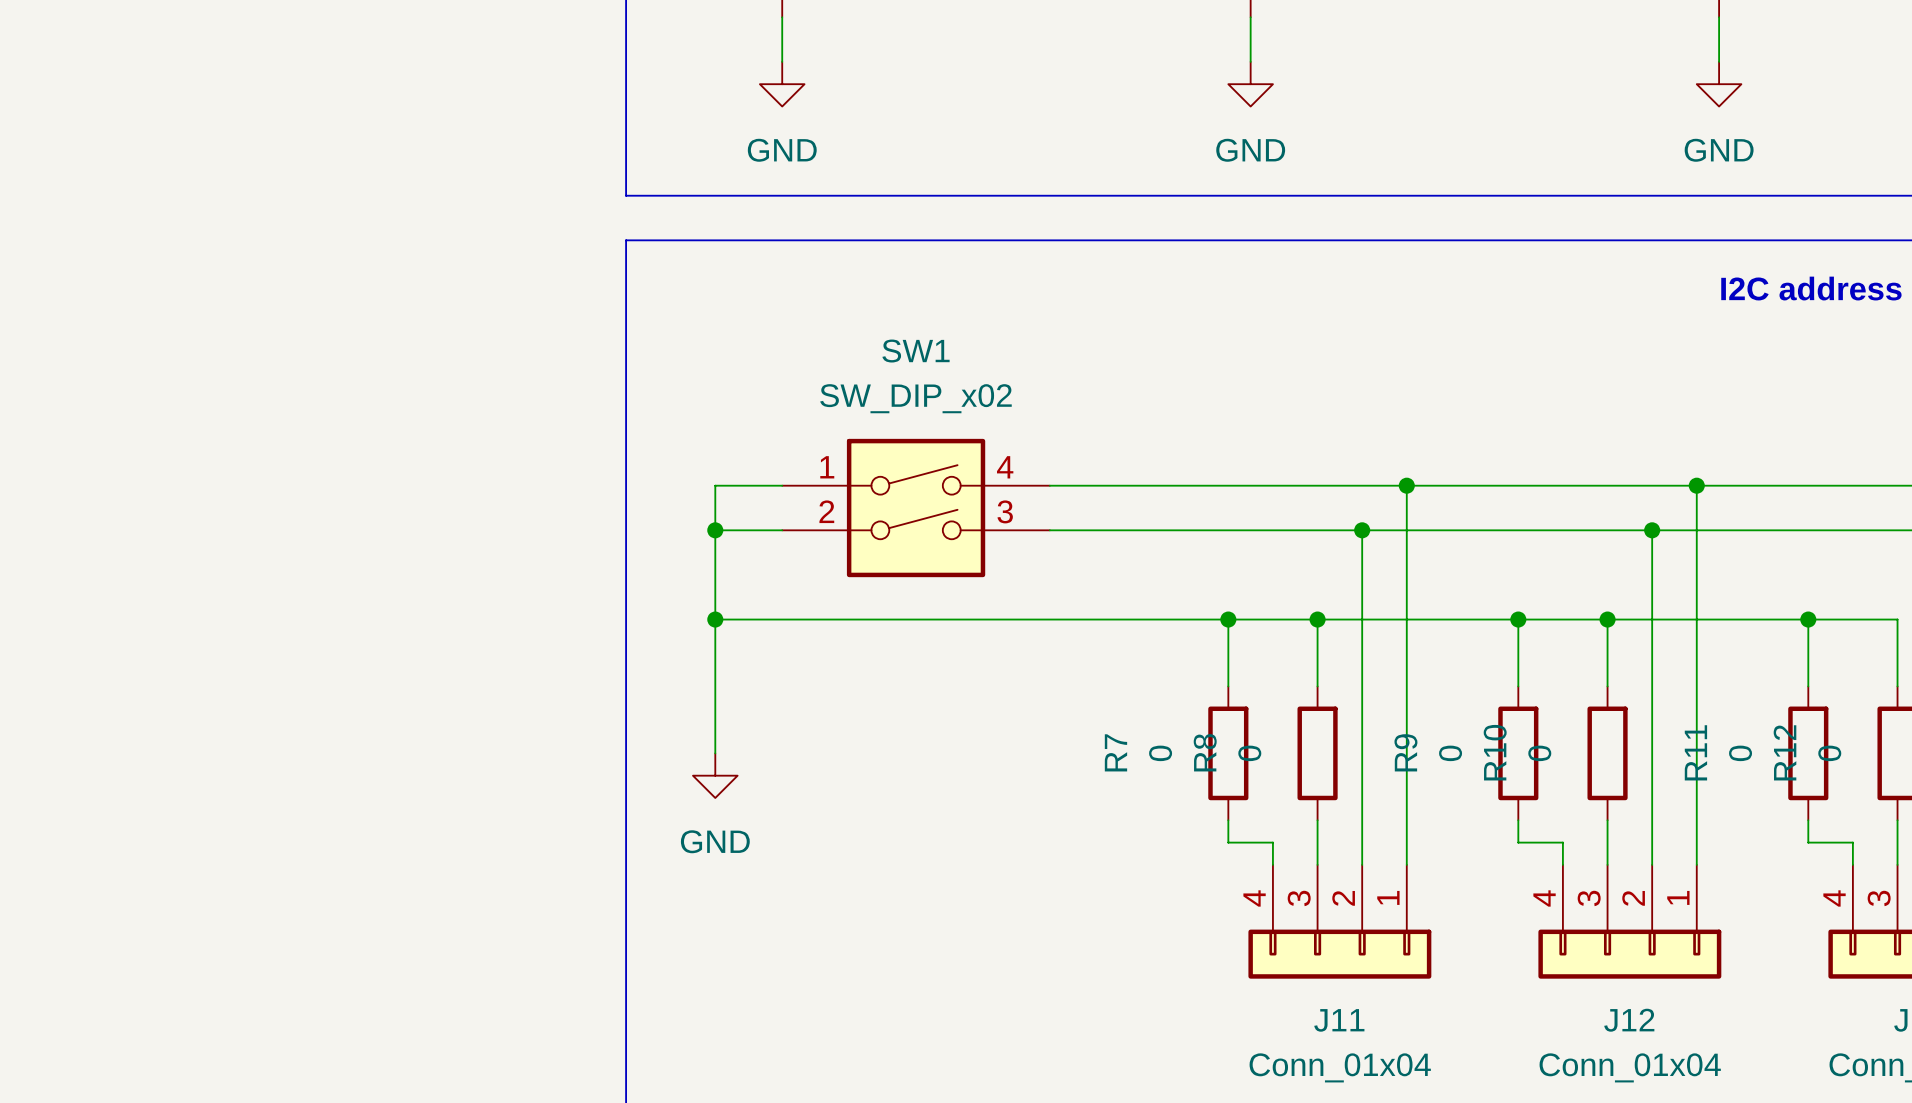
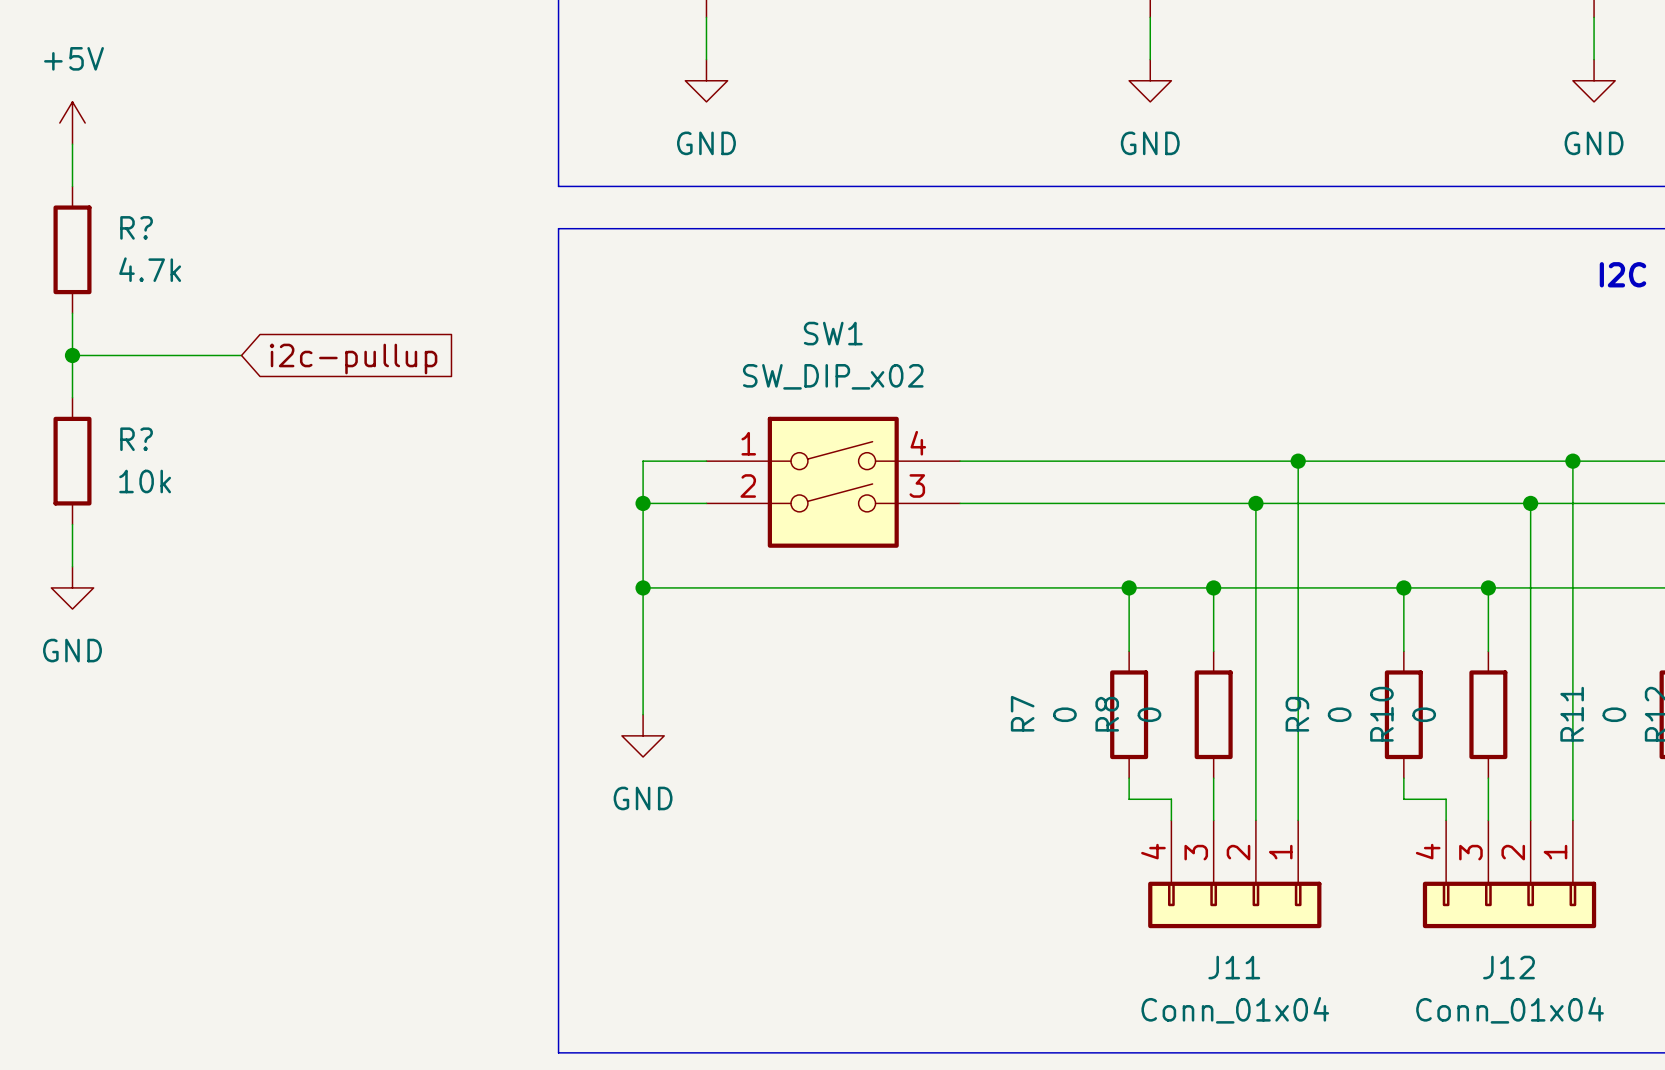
power symbol: none -> +5V (72, 123)
wire: none -> (72, 144) (72, 186)
R?: none -> 4.7k (72, 249)
wire: none -> (72, 313) (72, 397)
wire: none -> (72, 355) (241, 355)
junction: none -> (72, 355)
global label: none -> i2c-pullup (353, 359)
R?: none -> 10k (72, 461)
wire: none -> (72, 524) (72, 566)
power symbol: none -> GND (72, 587)

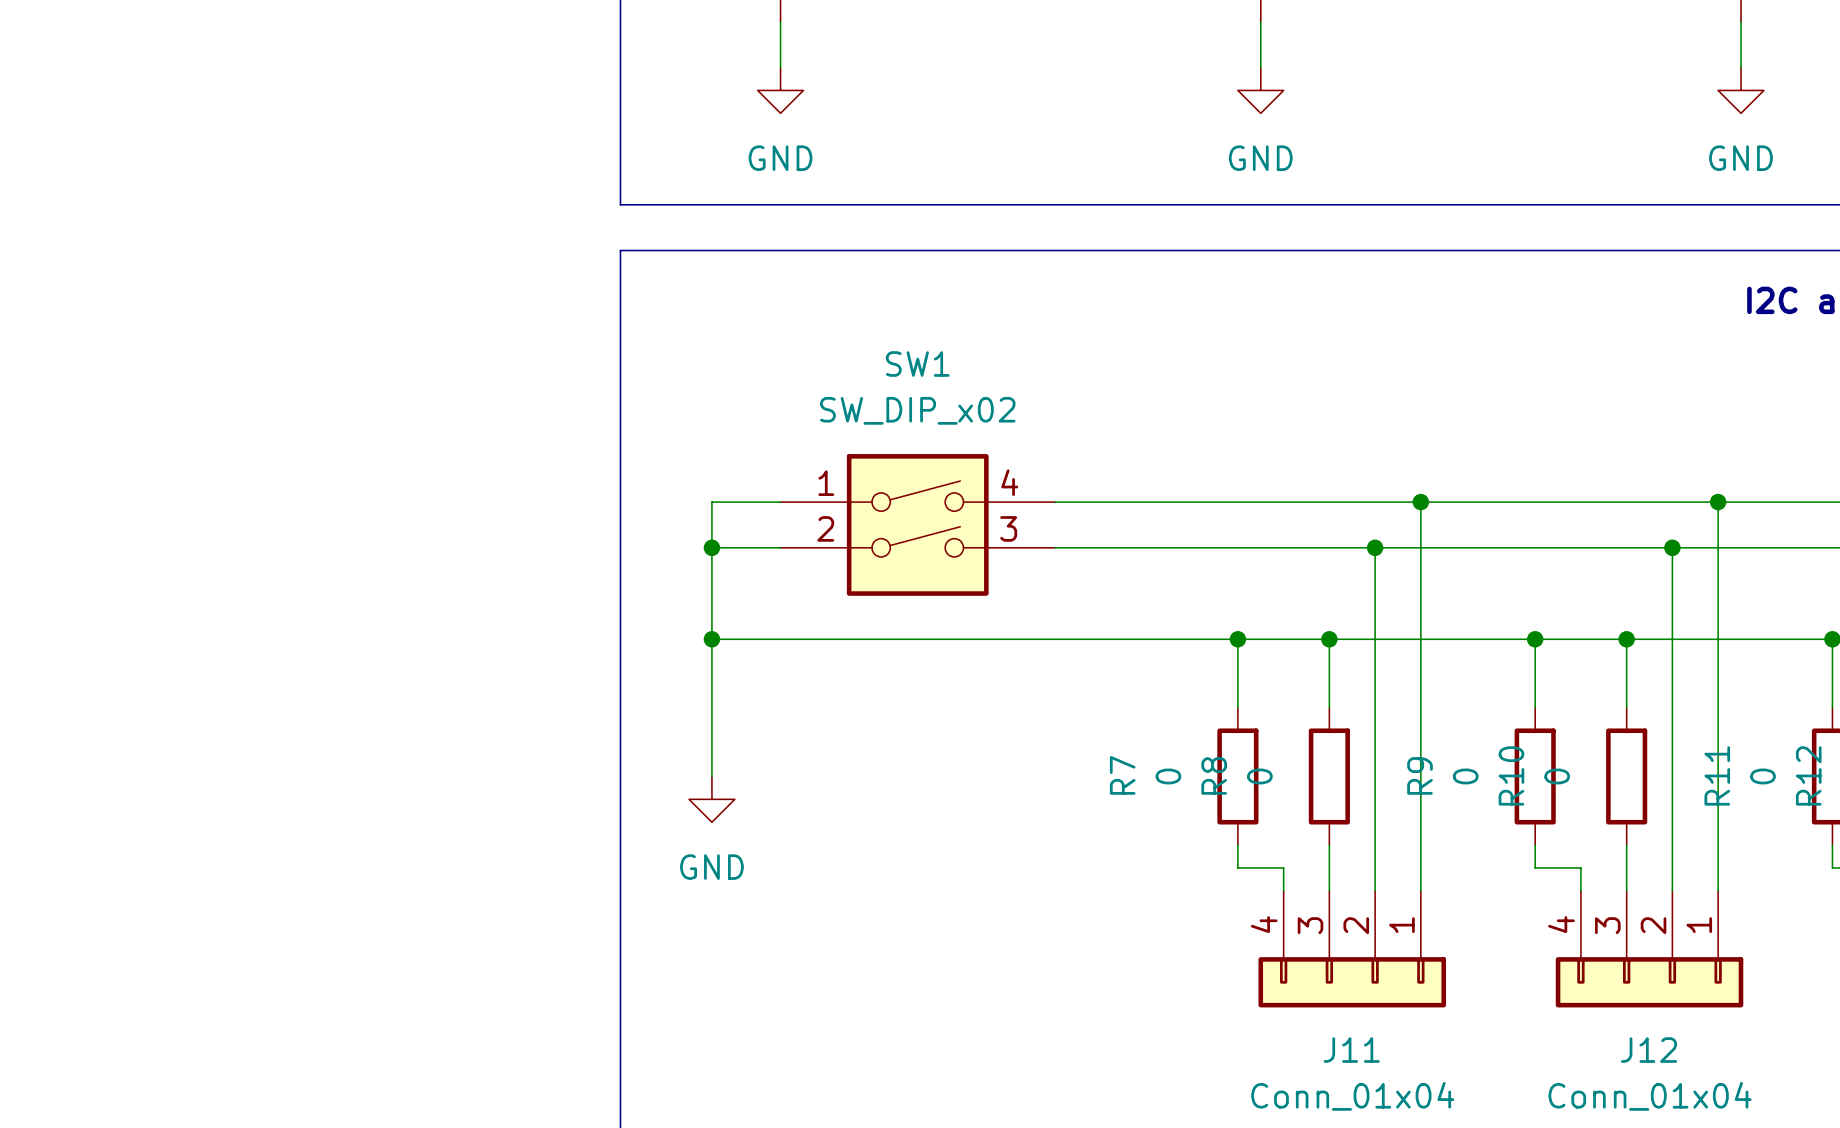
power symbol: +5V (72, 123) -> none
wire: (72, 144) (72, 186) -> none
R?: 4.7k (72, 249) -> none
wire: (72, 313) (72, 397) -> none
wire: (72, 355) (241, 355) -> none
junction: (72, 355) -> none
global label: i2c-pullup (353, 359) -> none
R?: 10k (72, 461) -> none
wire: (72, 524) (72, 566) -> none
power symbol: GND (72, 587) -> none

